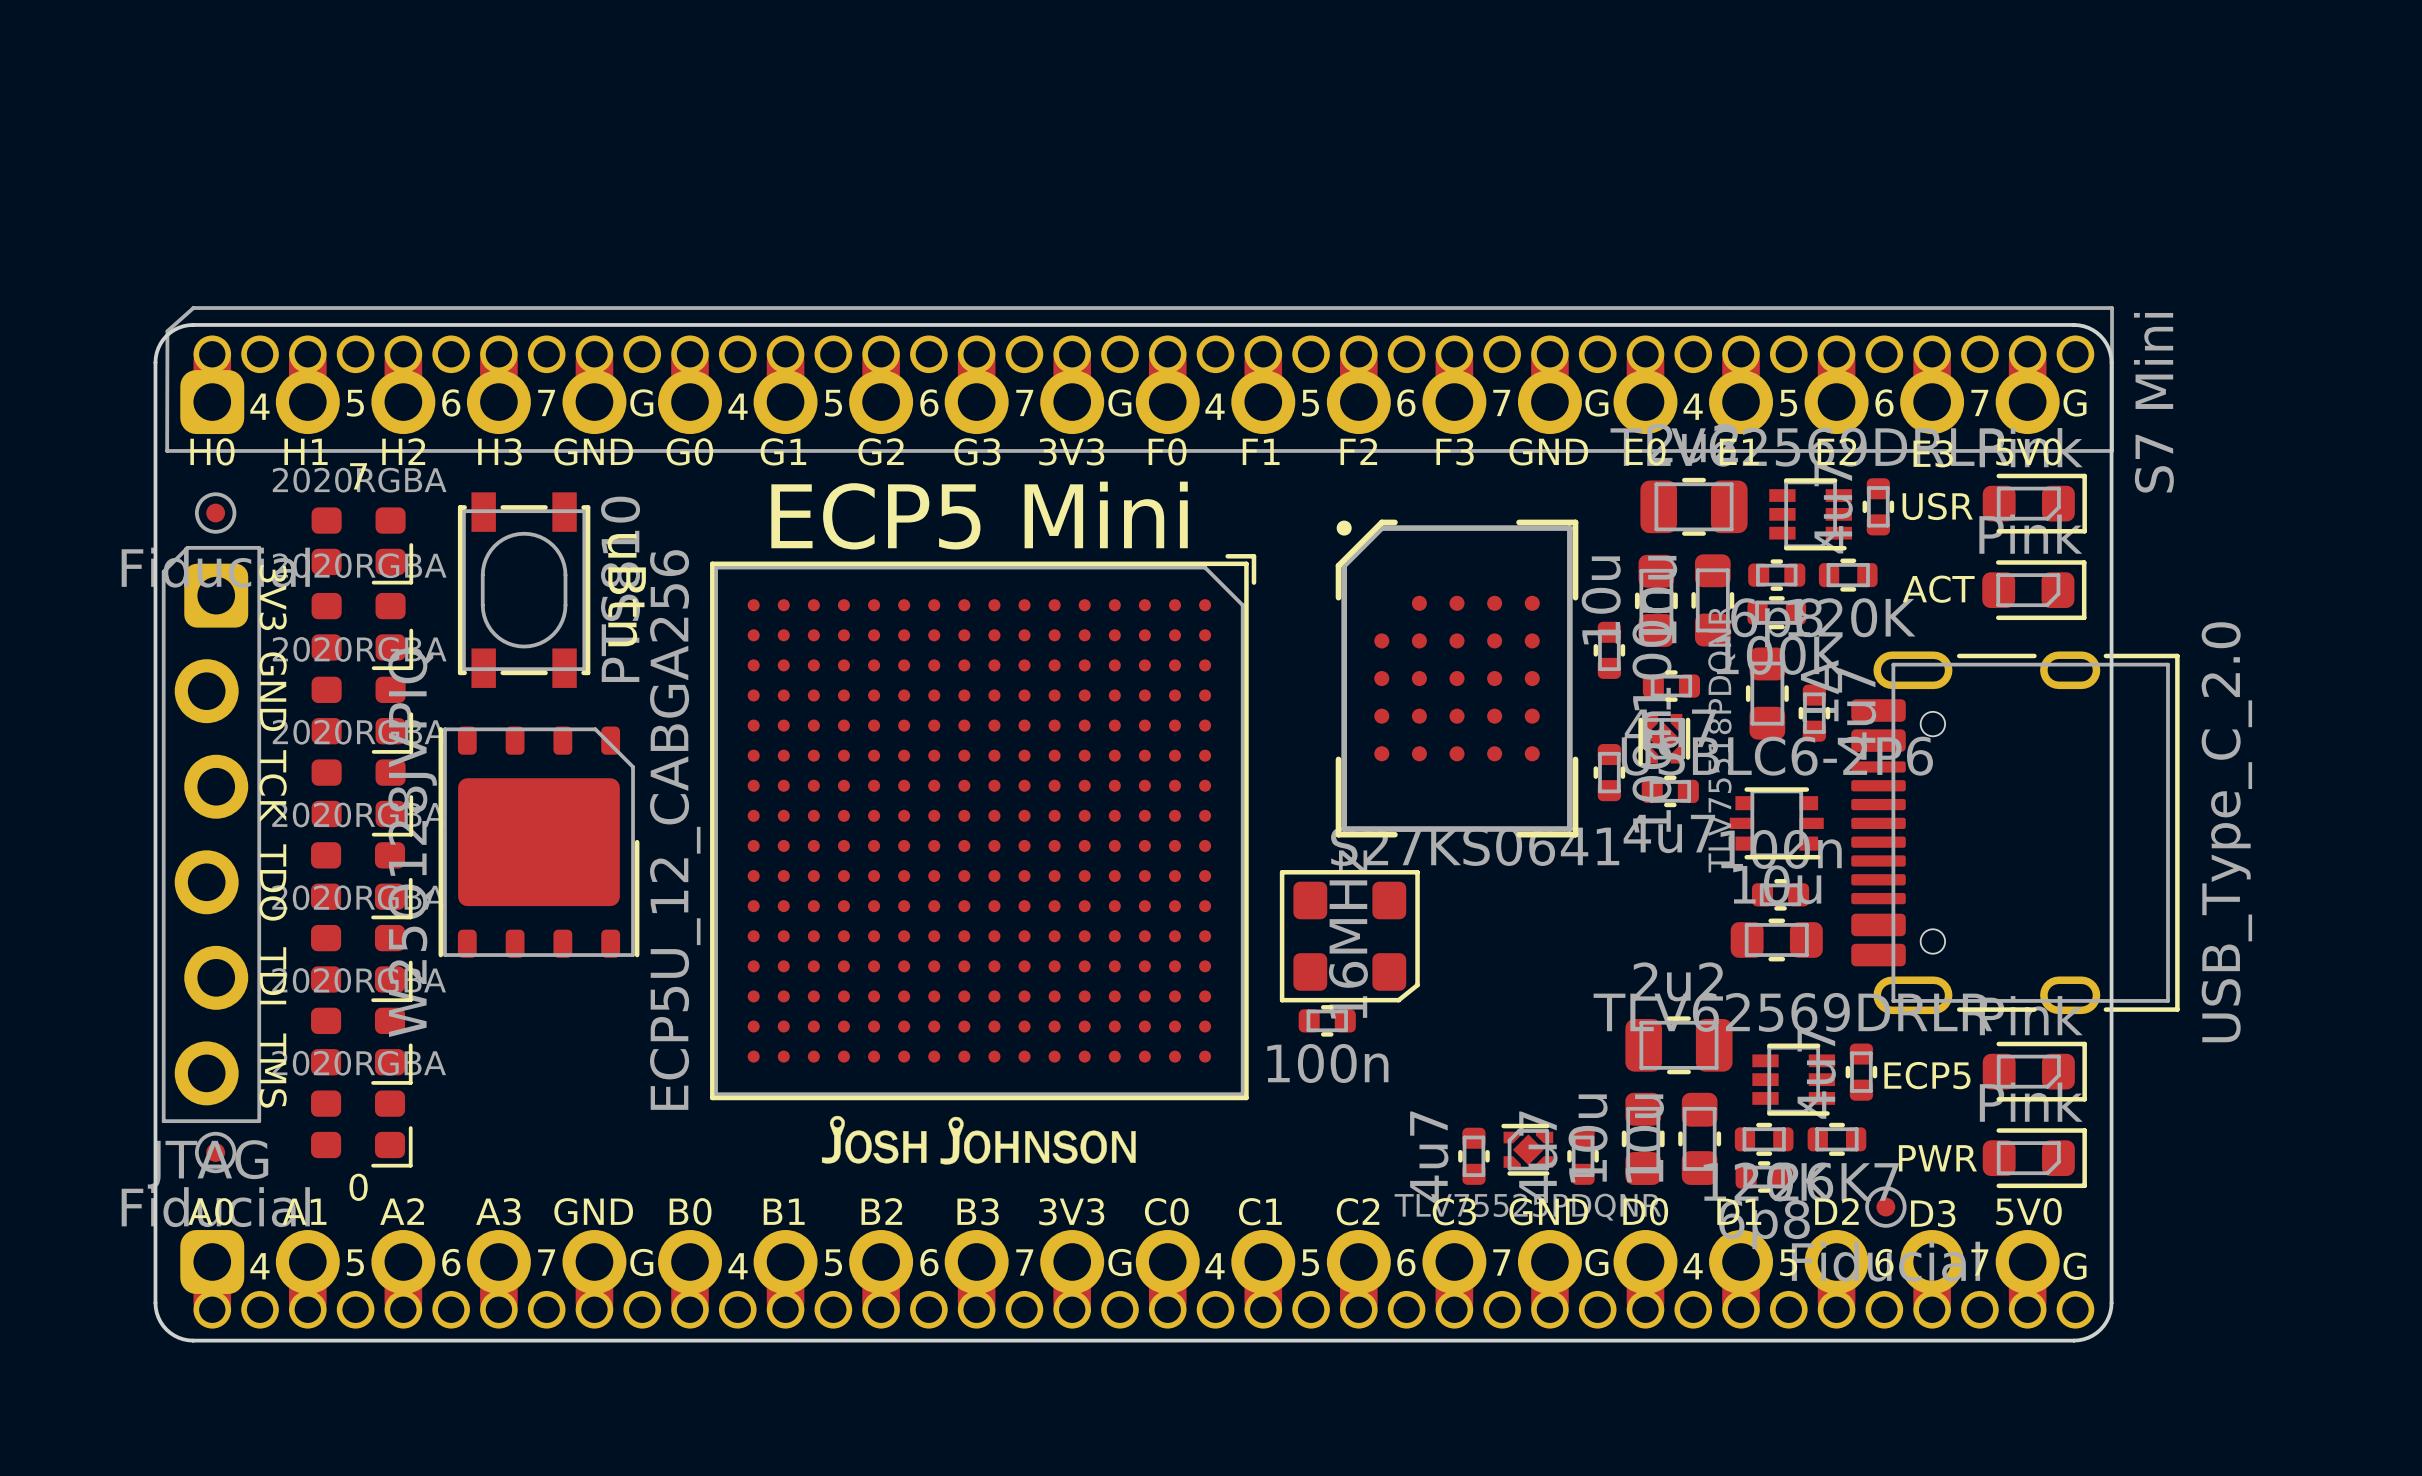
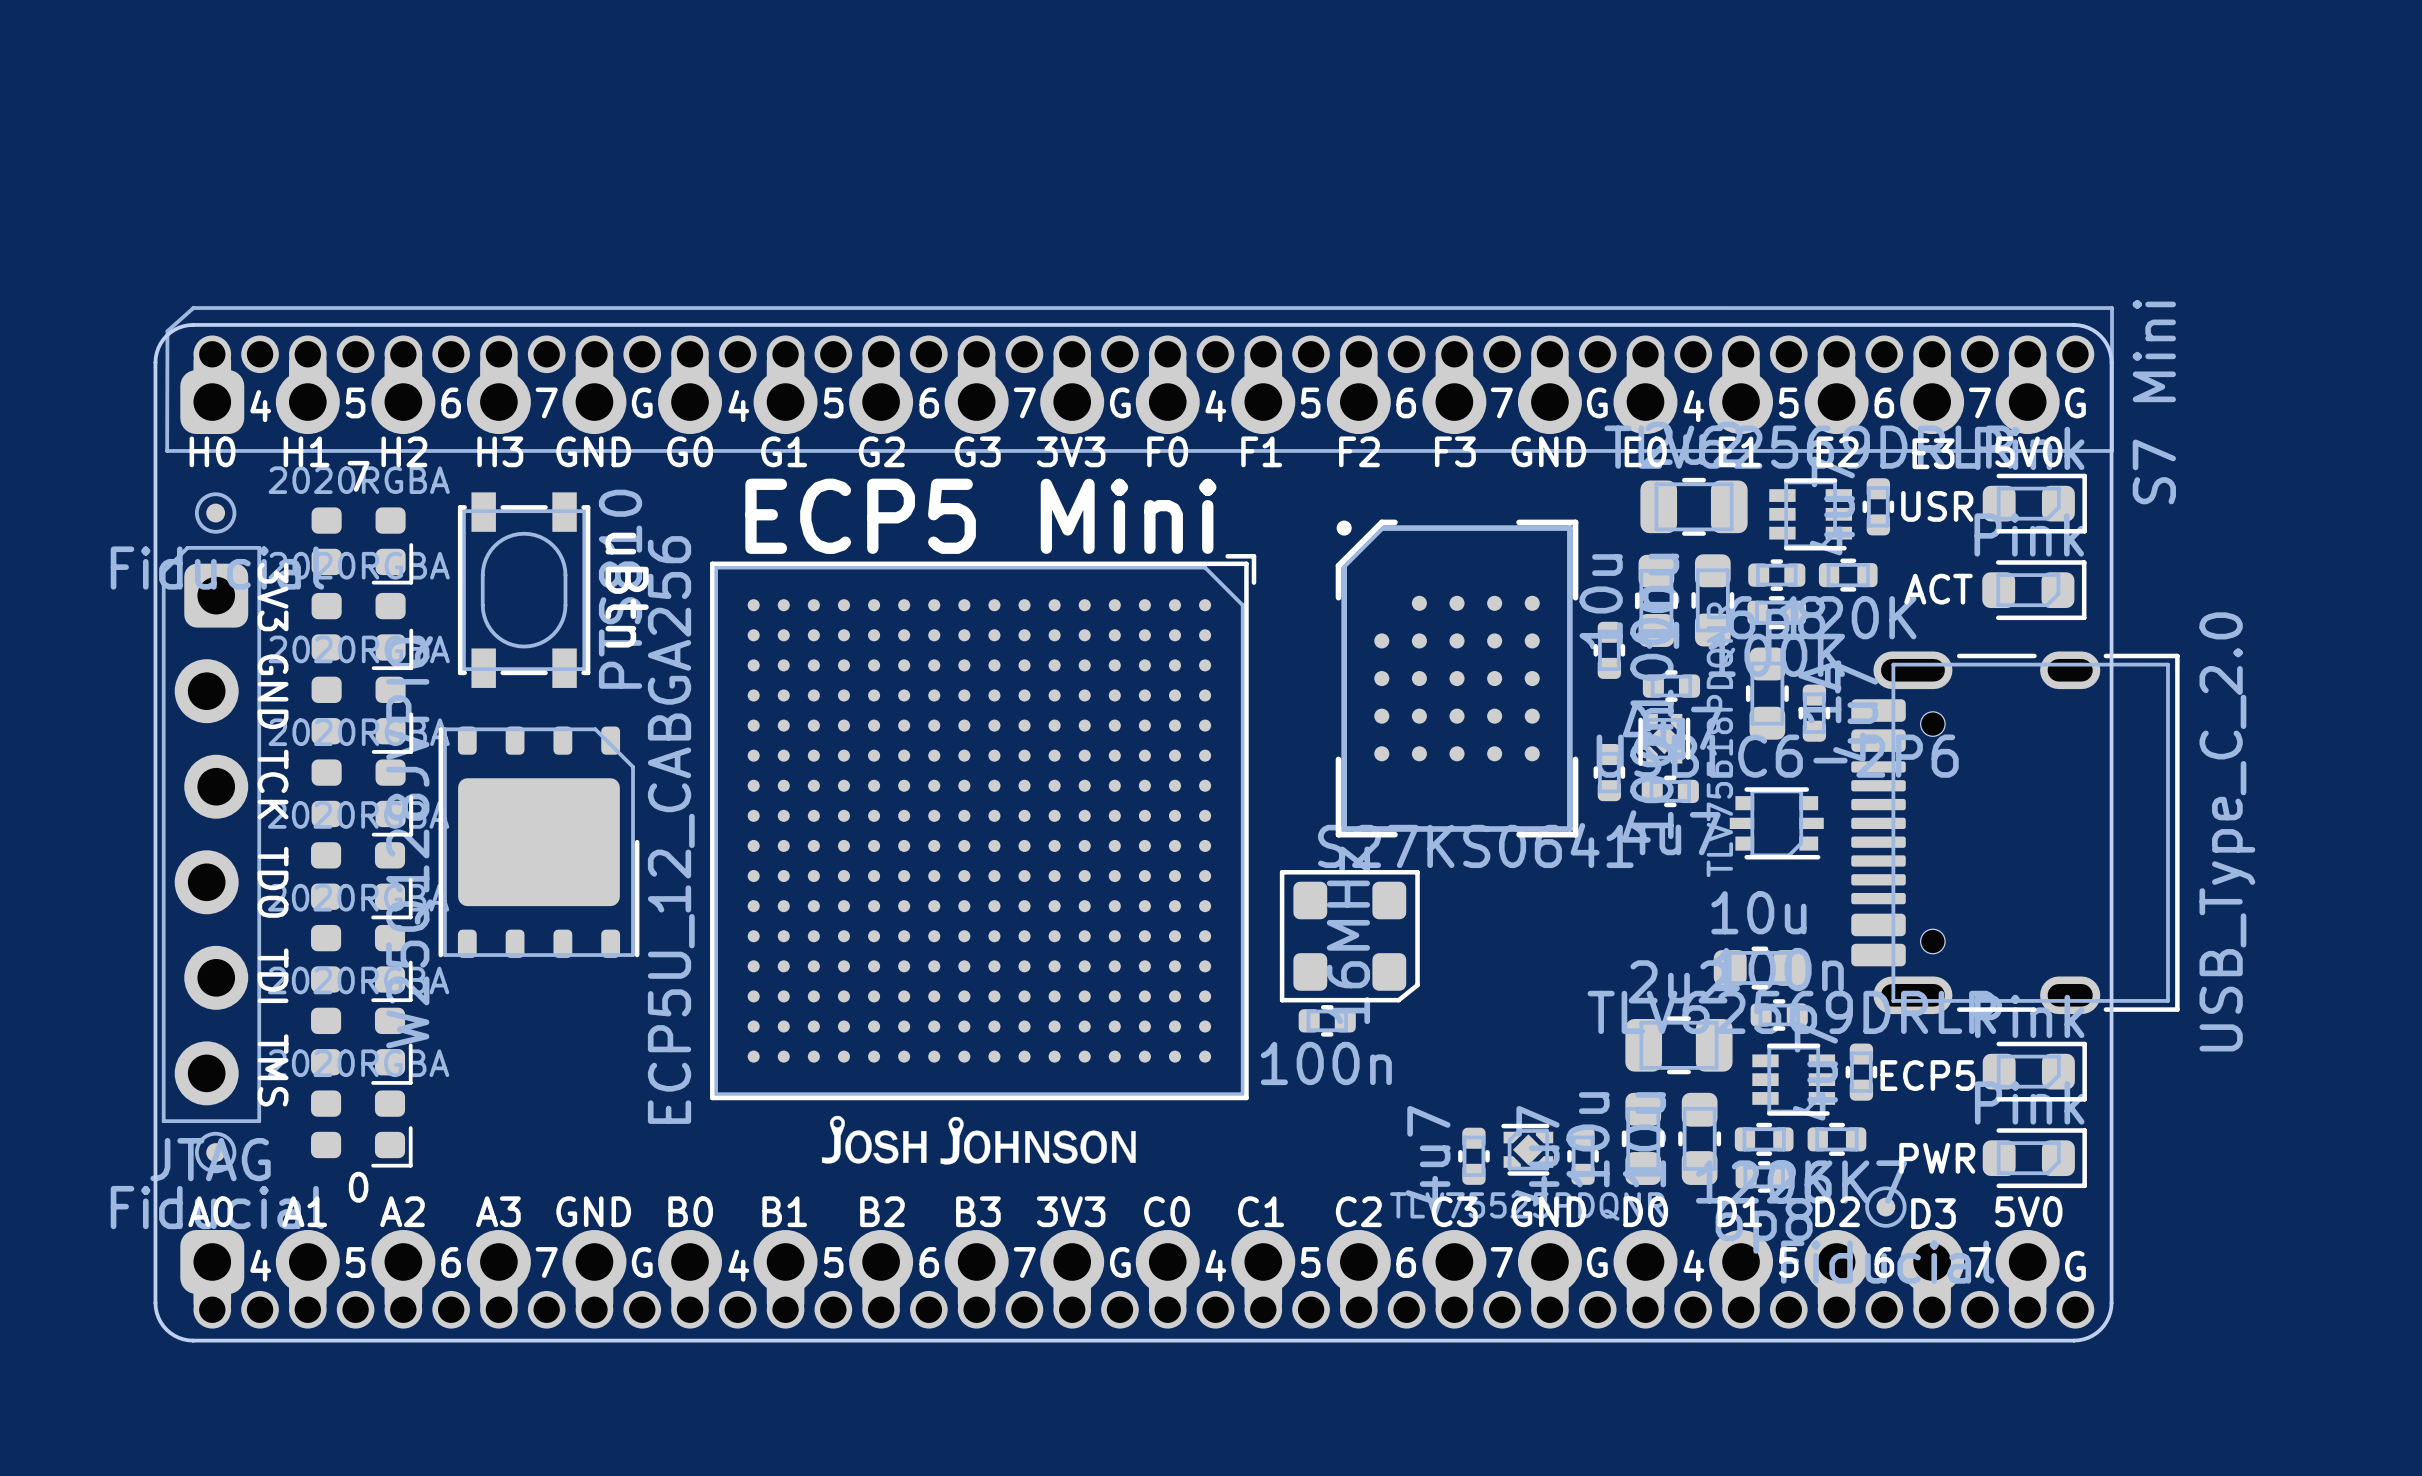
part position: (1780, 894) -> (1779, 1014)
part position: (1776, 939) -> (1759, 967)

